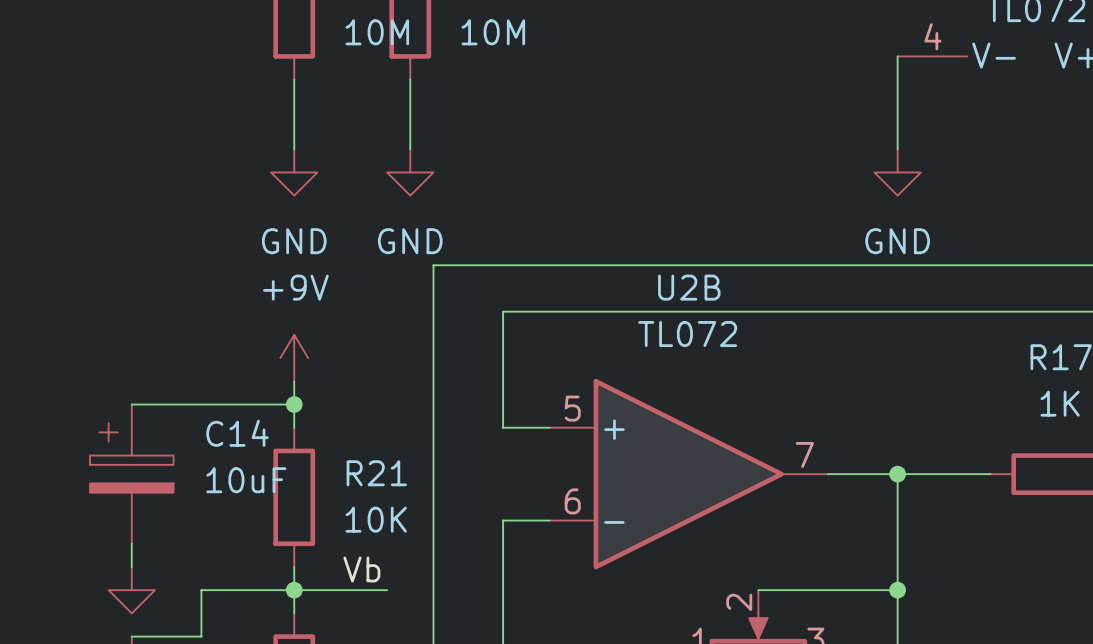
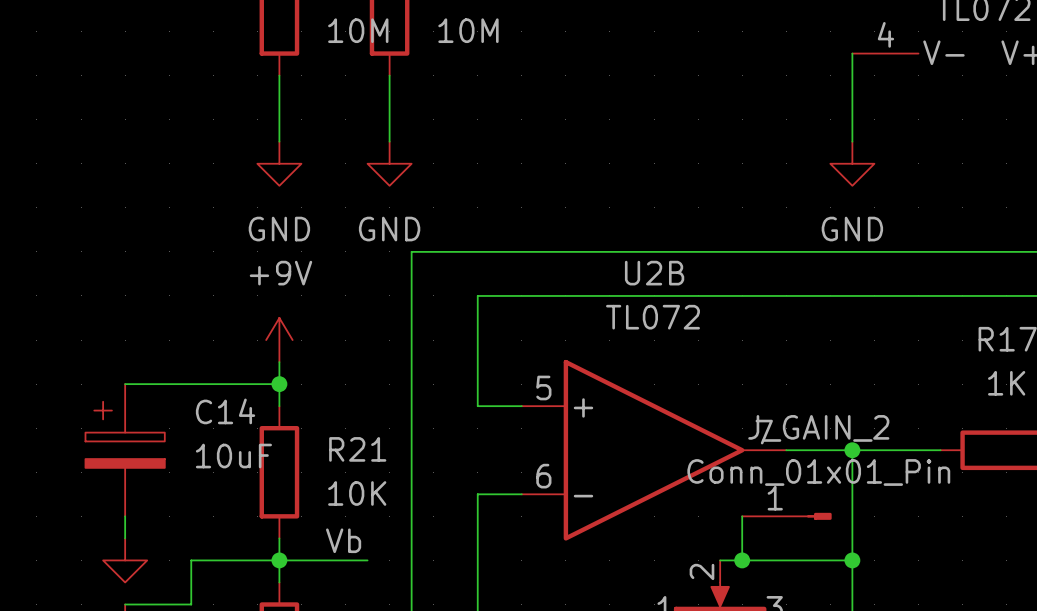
wire: none -> (742, 516) (742, 560)
J_GAIN_2: none -> Conn_01x01_Pin (786, 516)
junction: none -> (742, 560)

